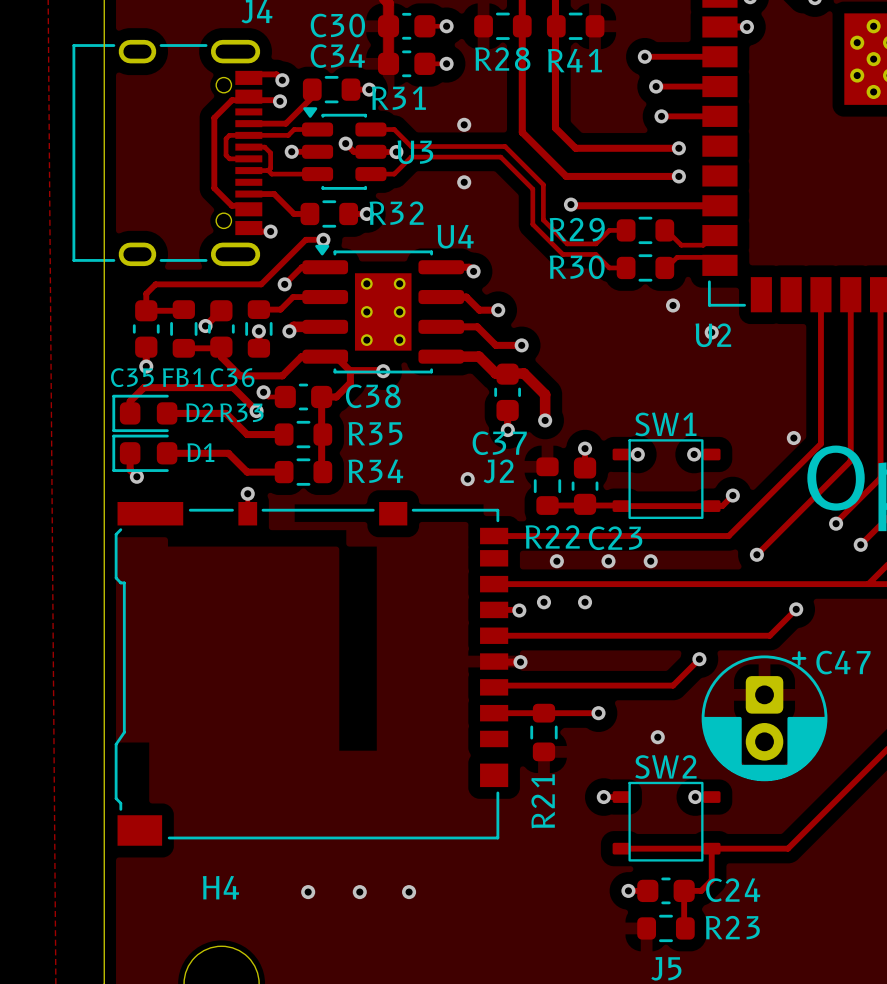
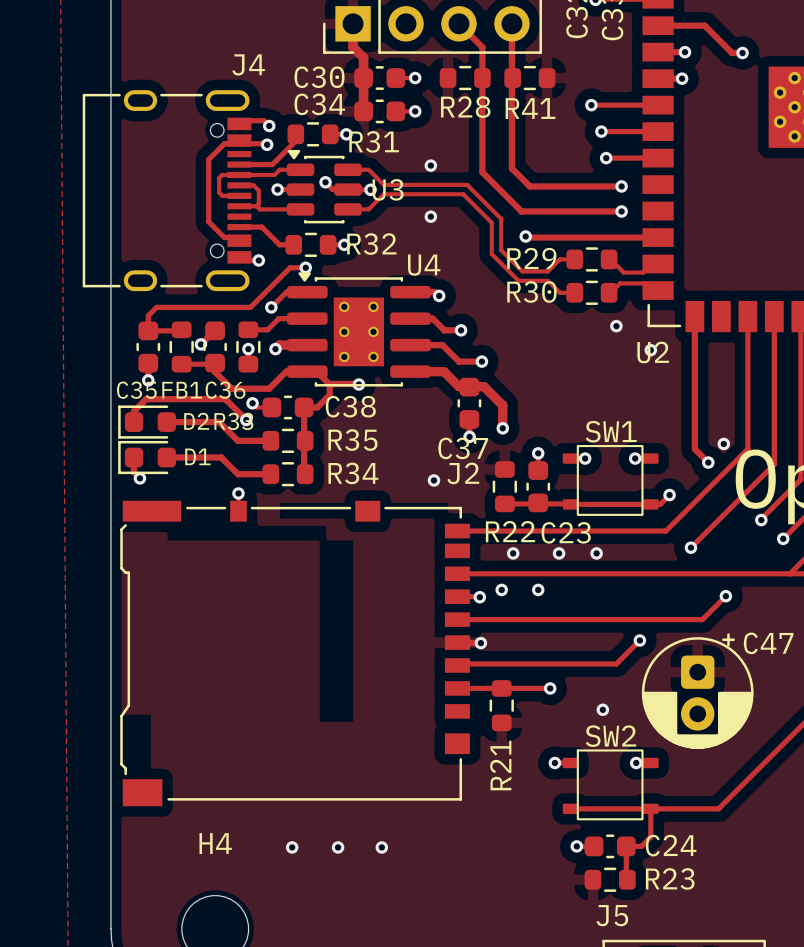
track: none -> (694, 316) (694, 449) (708, 462)
via: none -> (708, 462)

